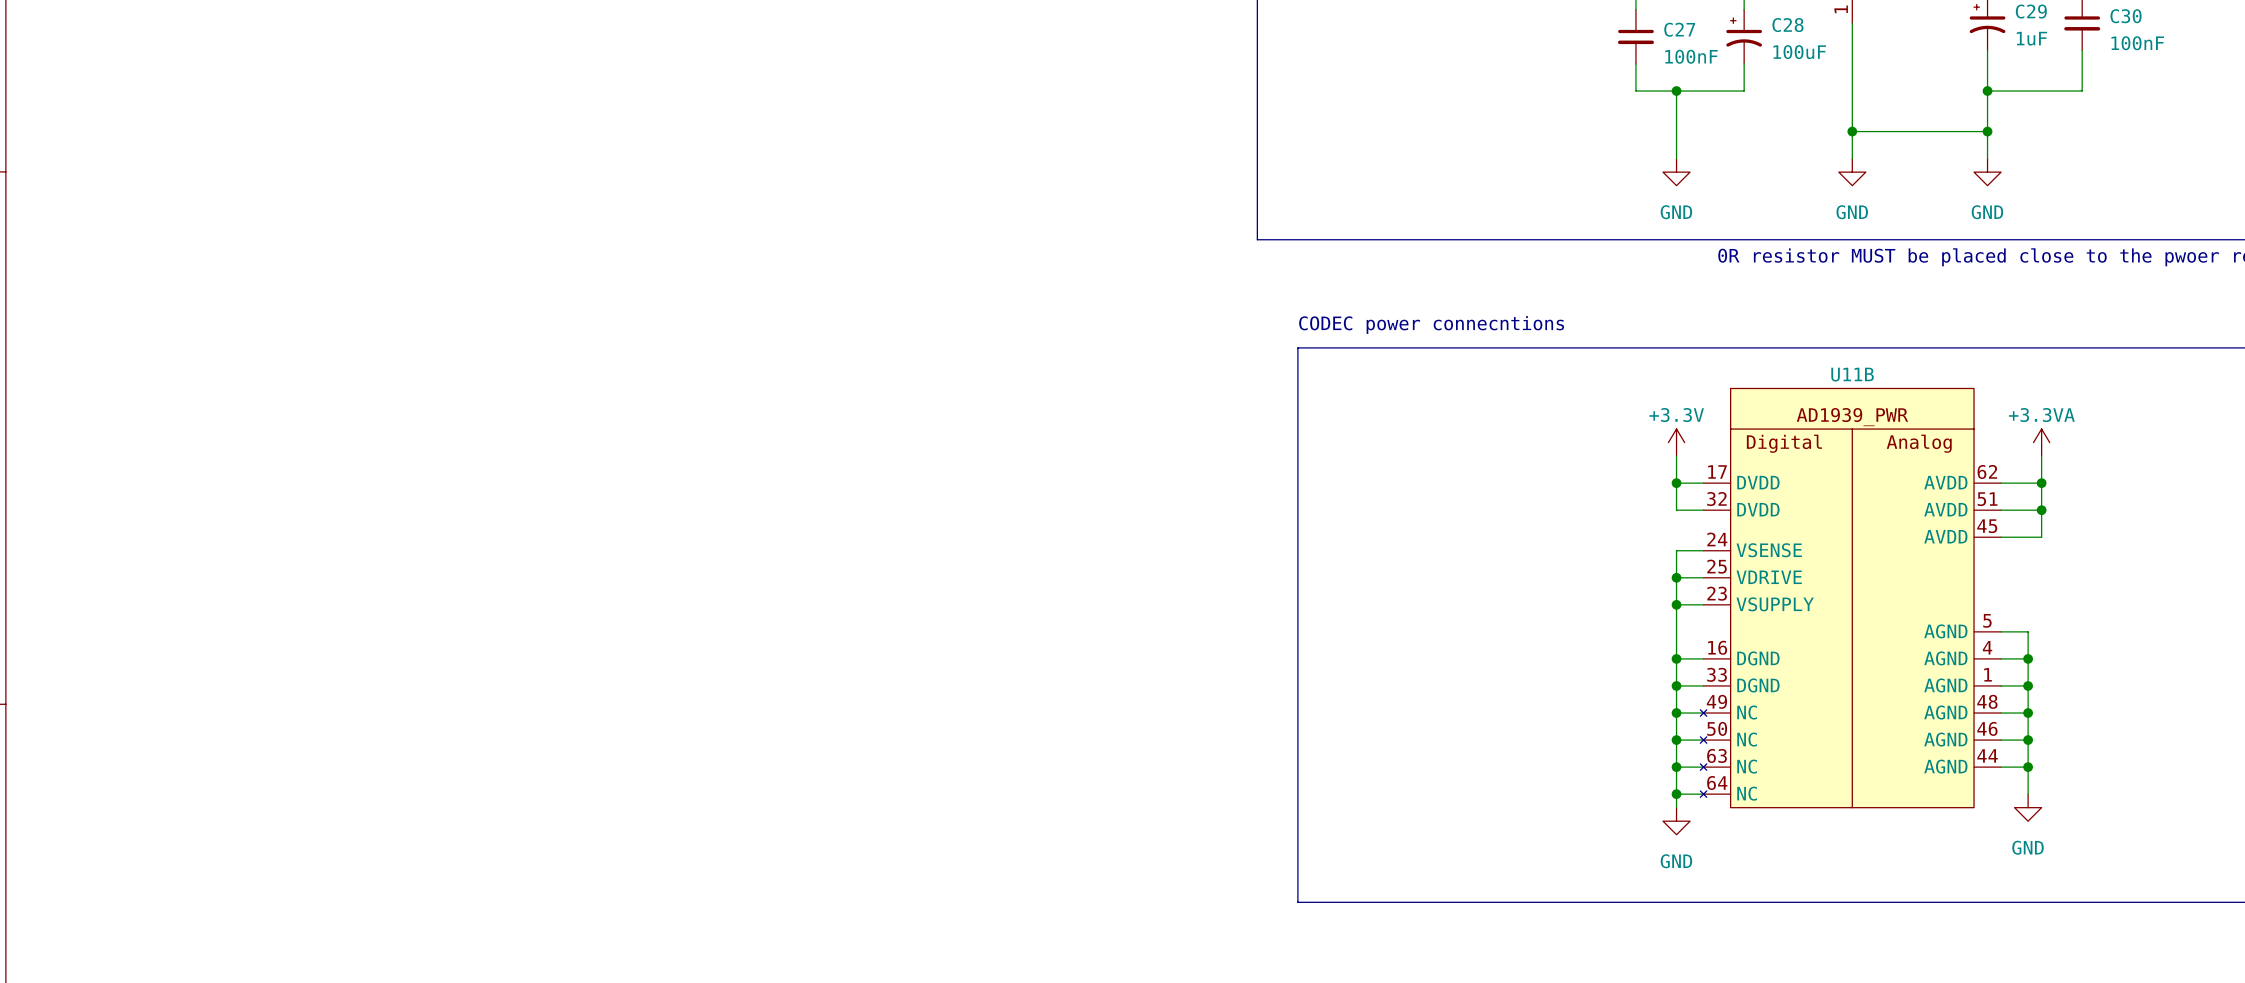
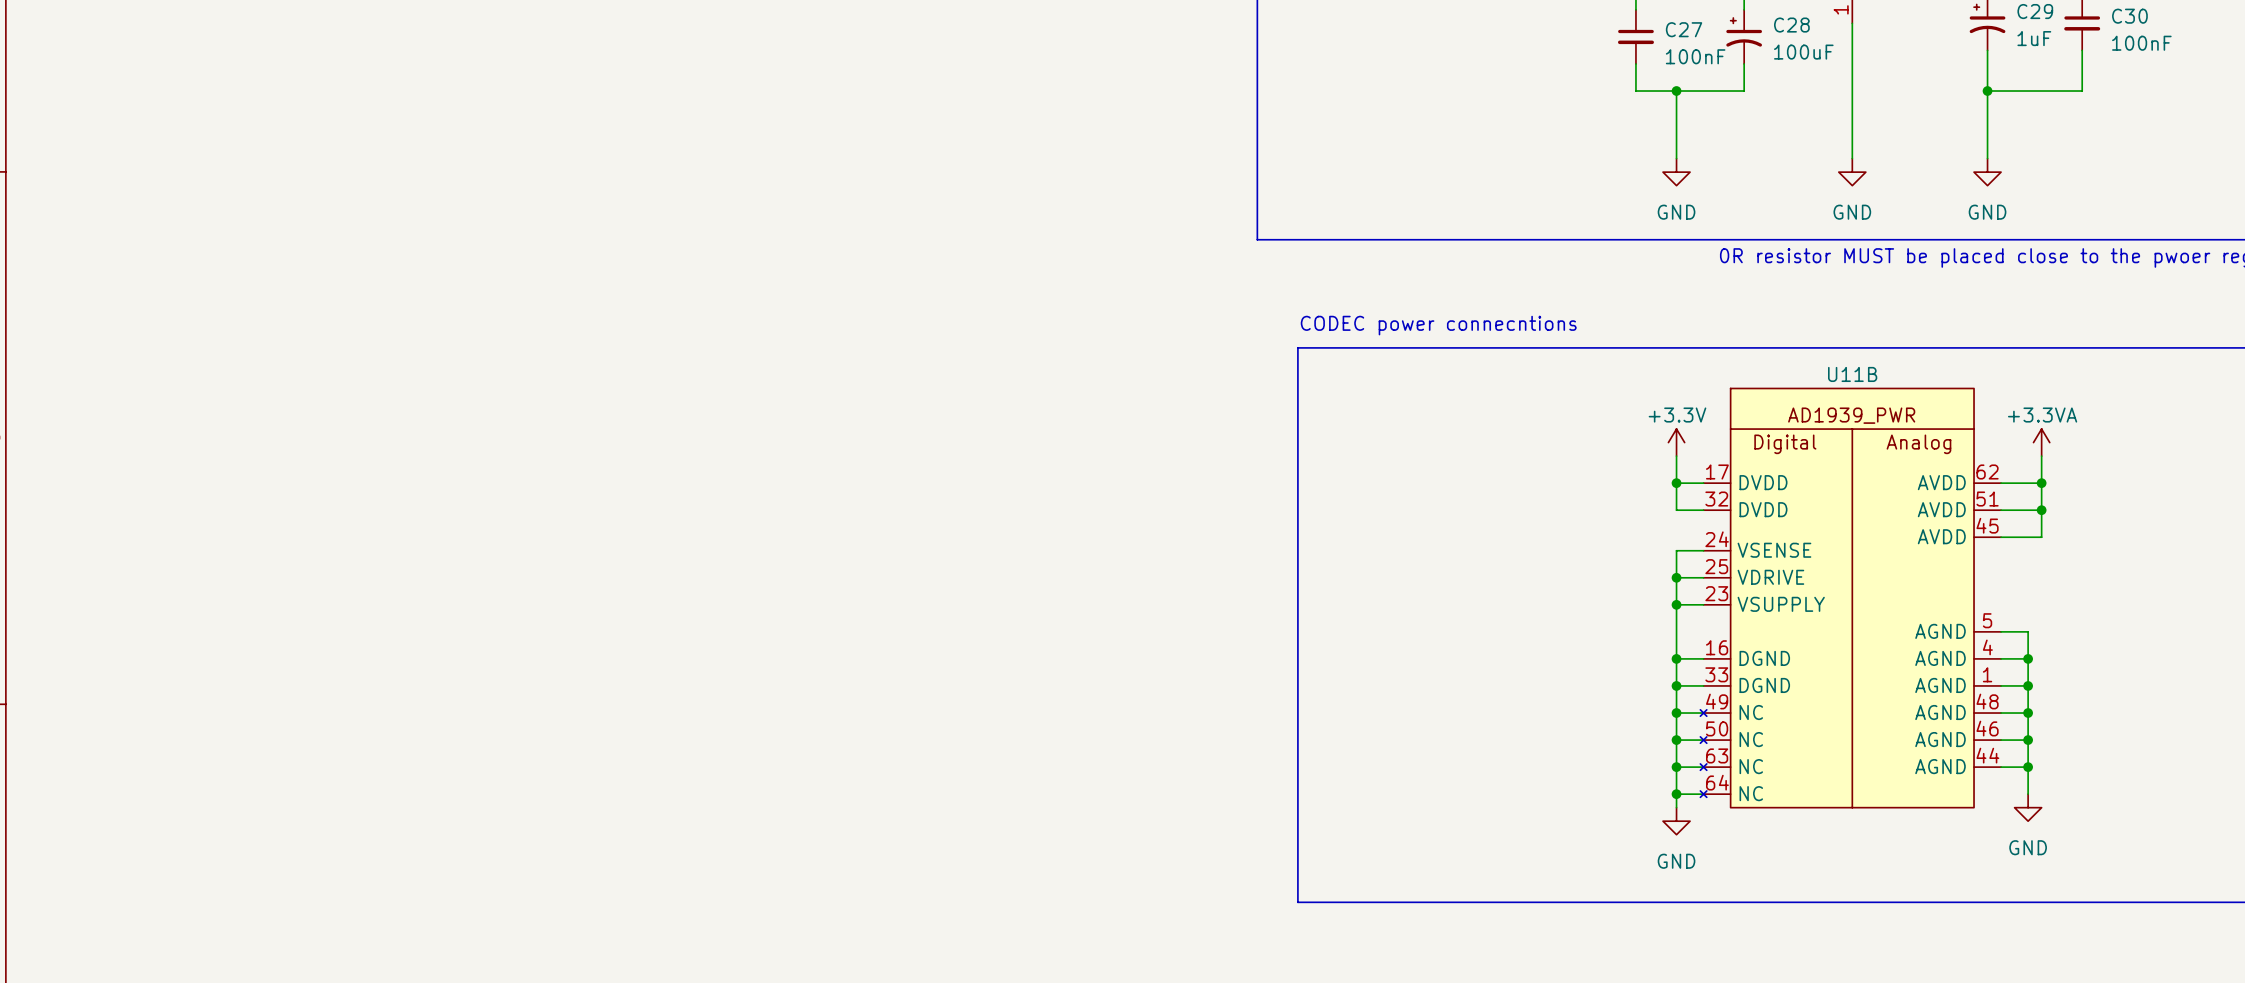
wire: (1852, 131) (1987, 131) -> none
junction: (1852, 131) -> none
junction: (1987, 131) -> none

